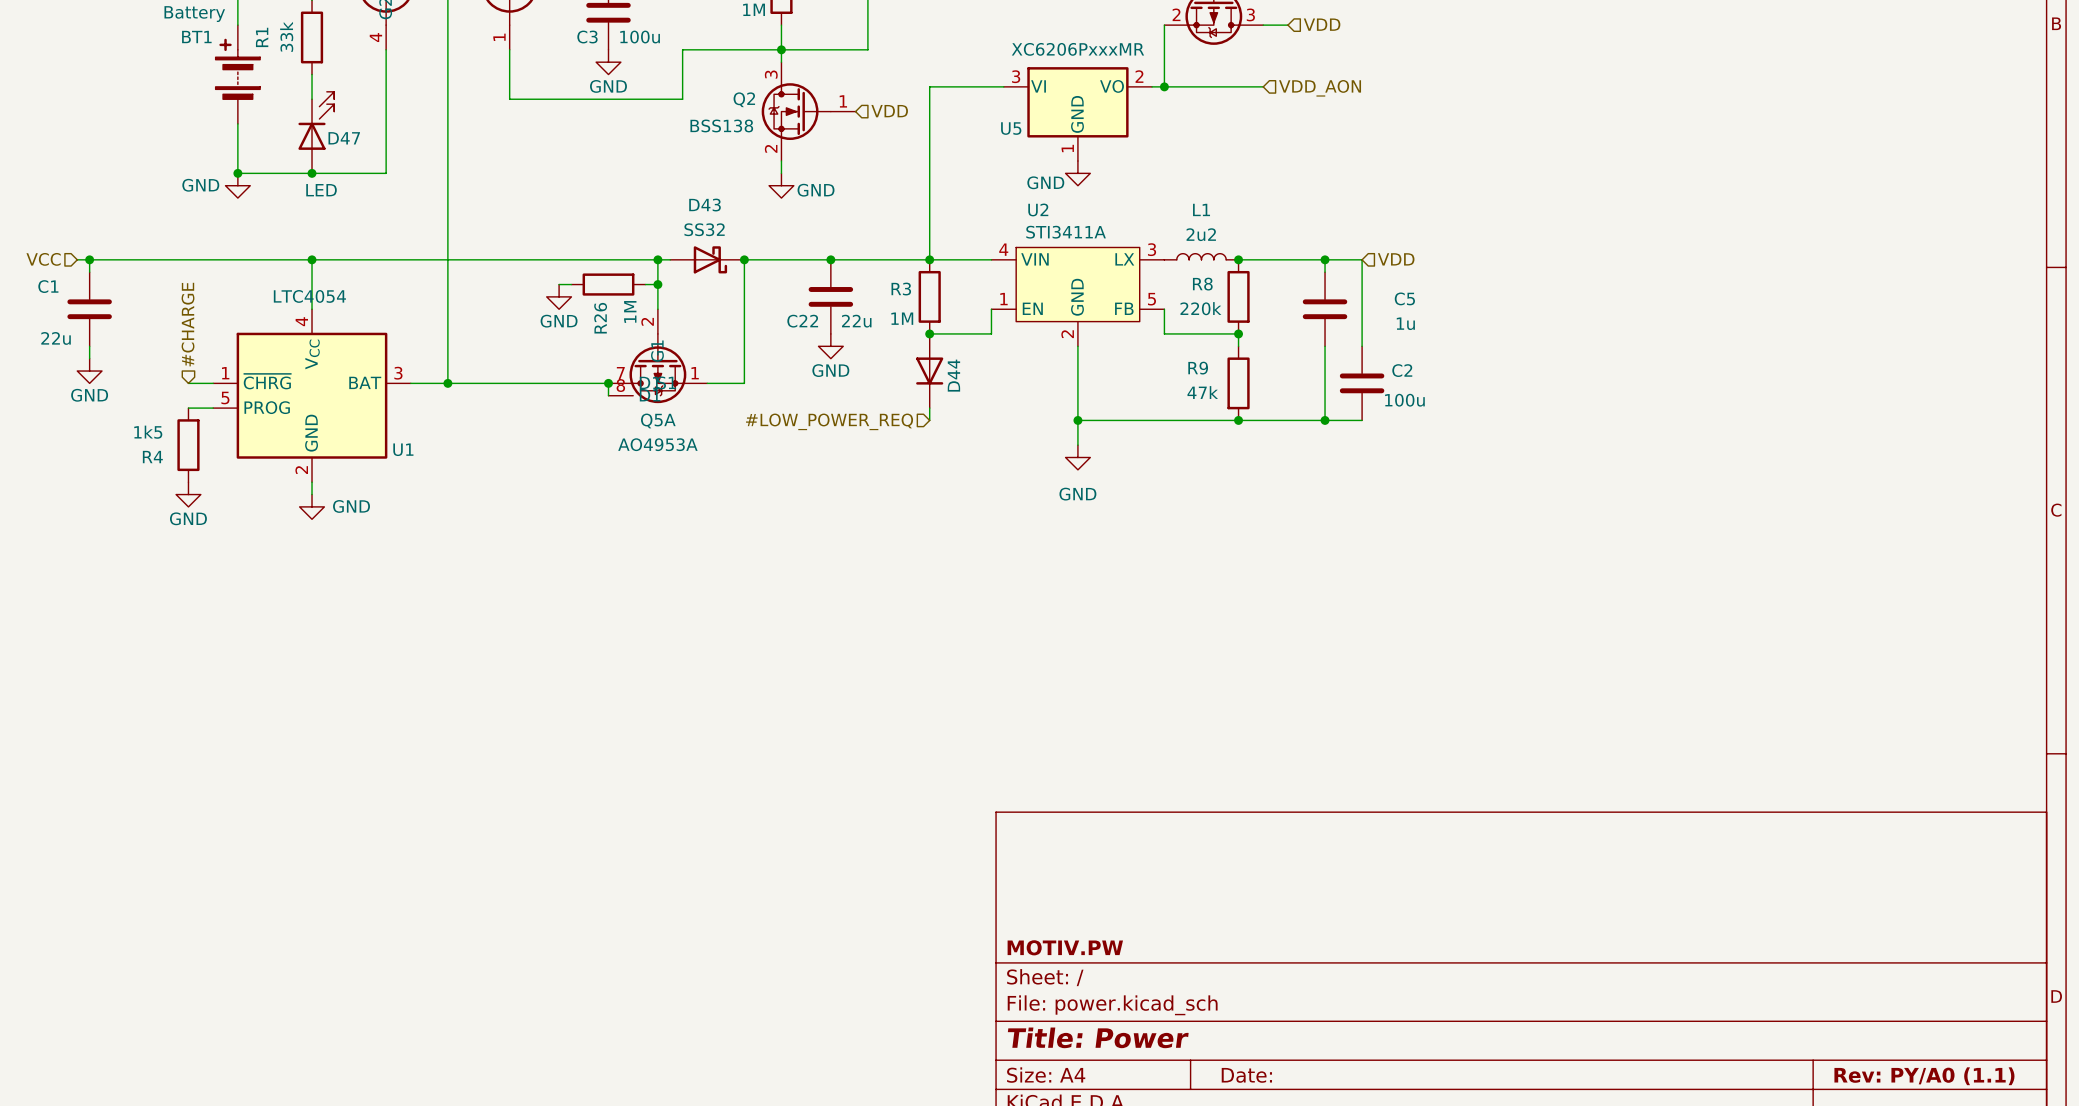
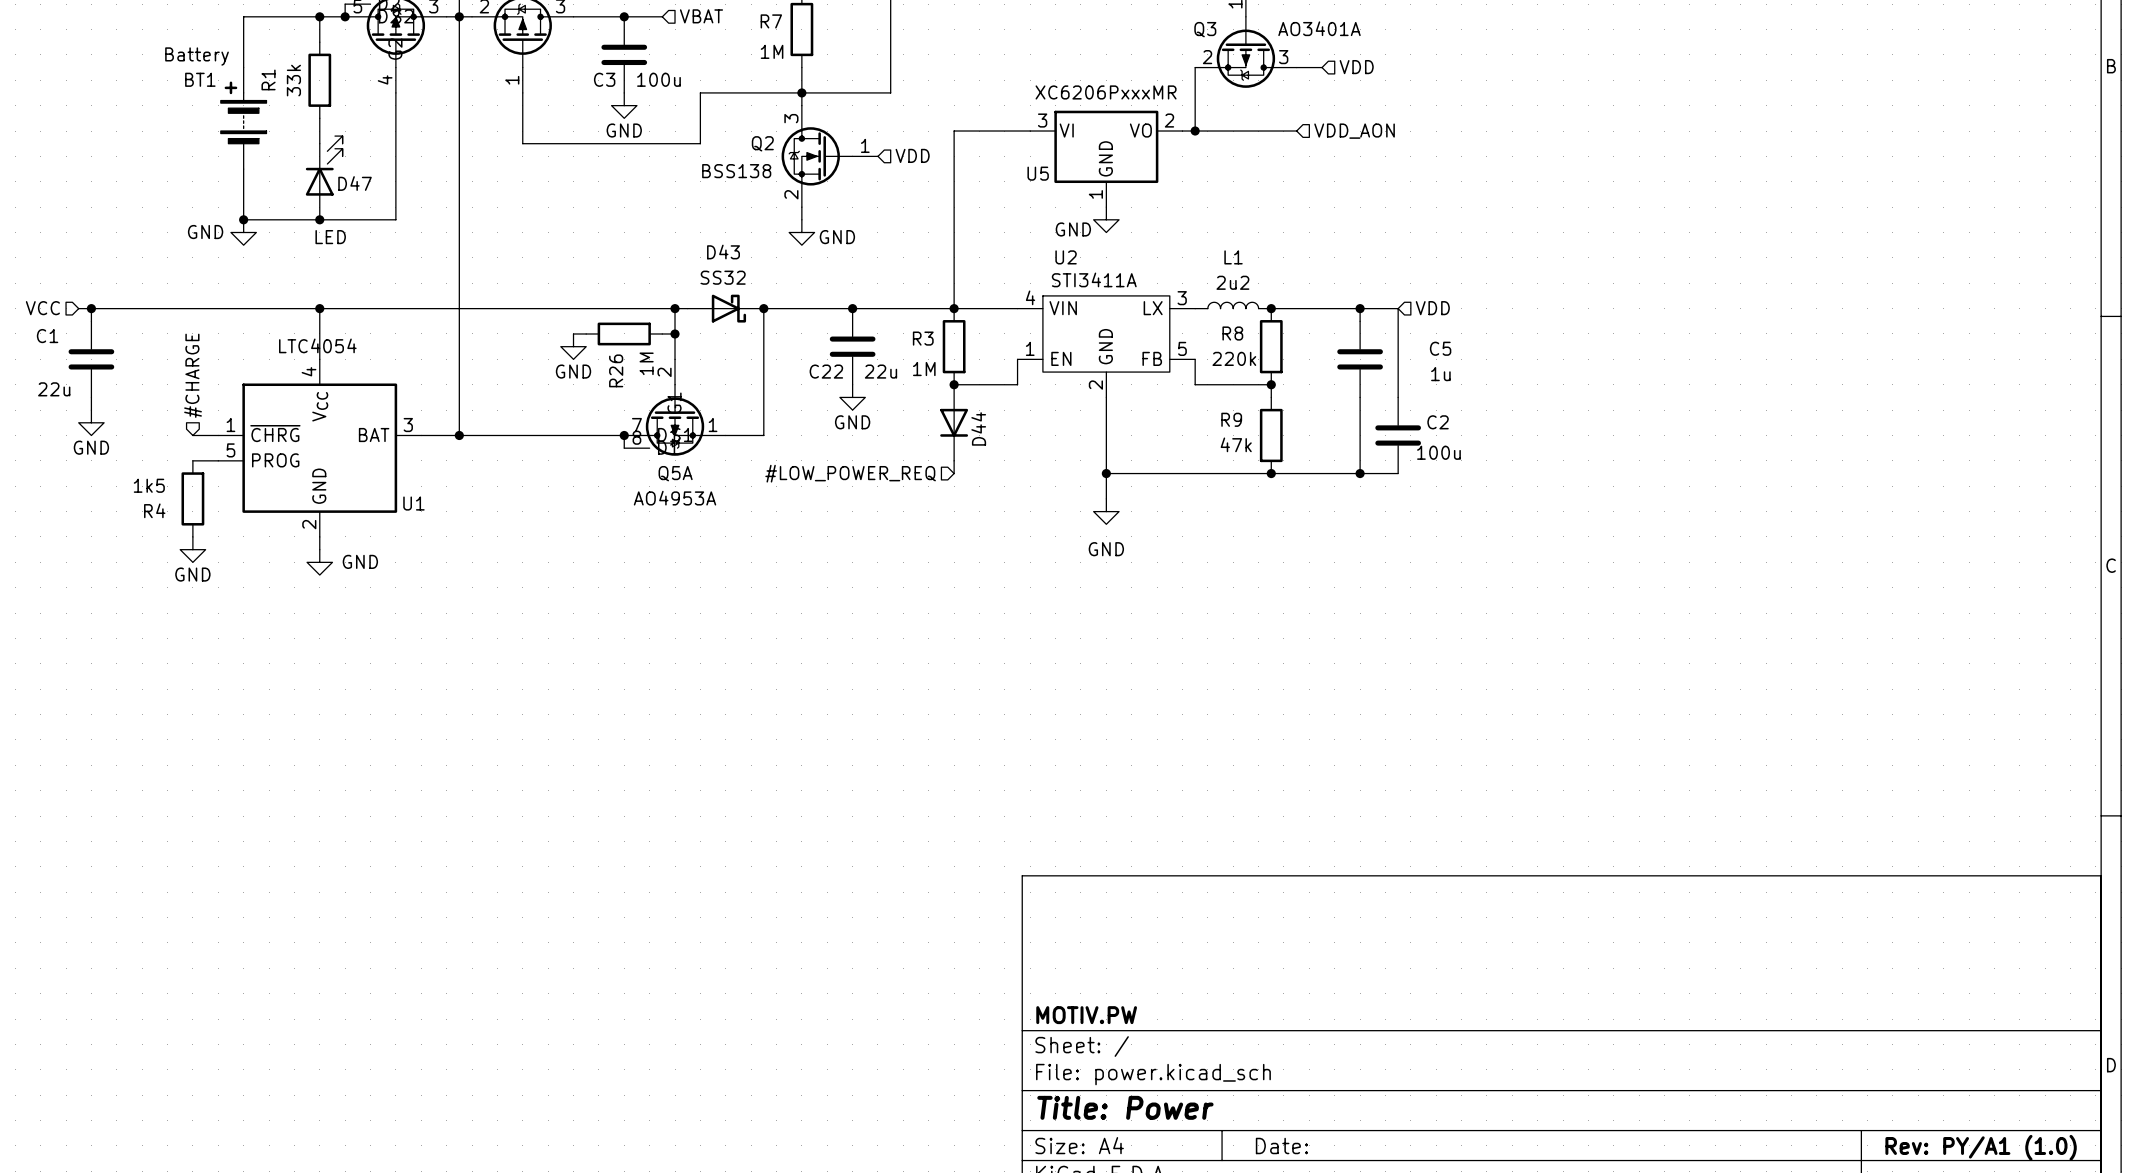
title block: Rev: PY/A0 (1.1) (1924, 1076) -> Rev: PY/A1 (1.0) (1981, 1147)

